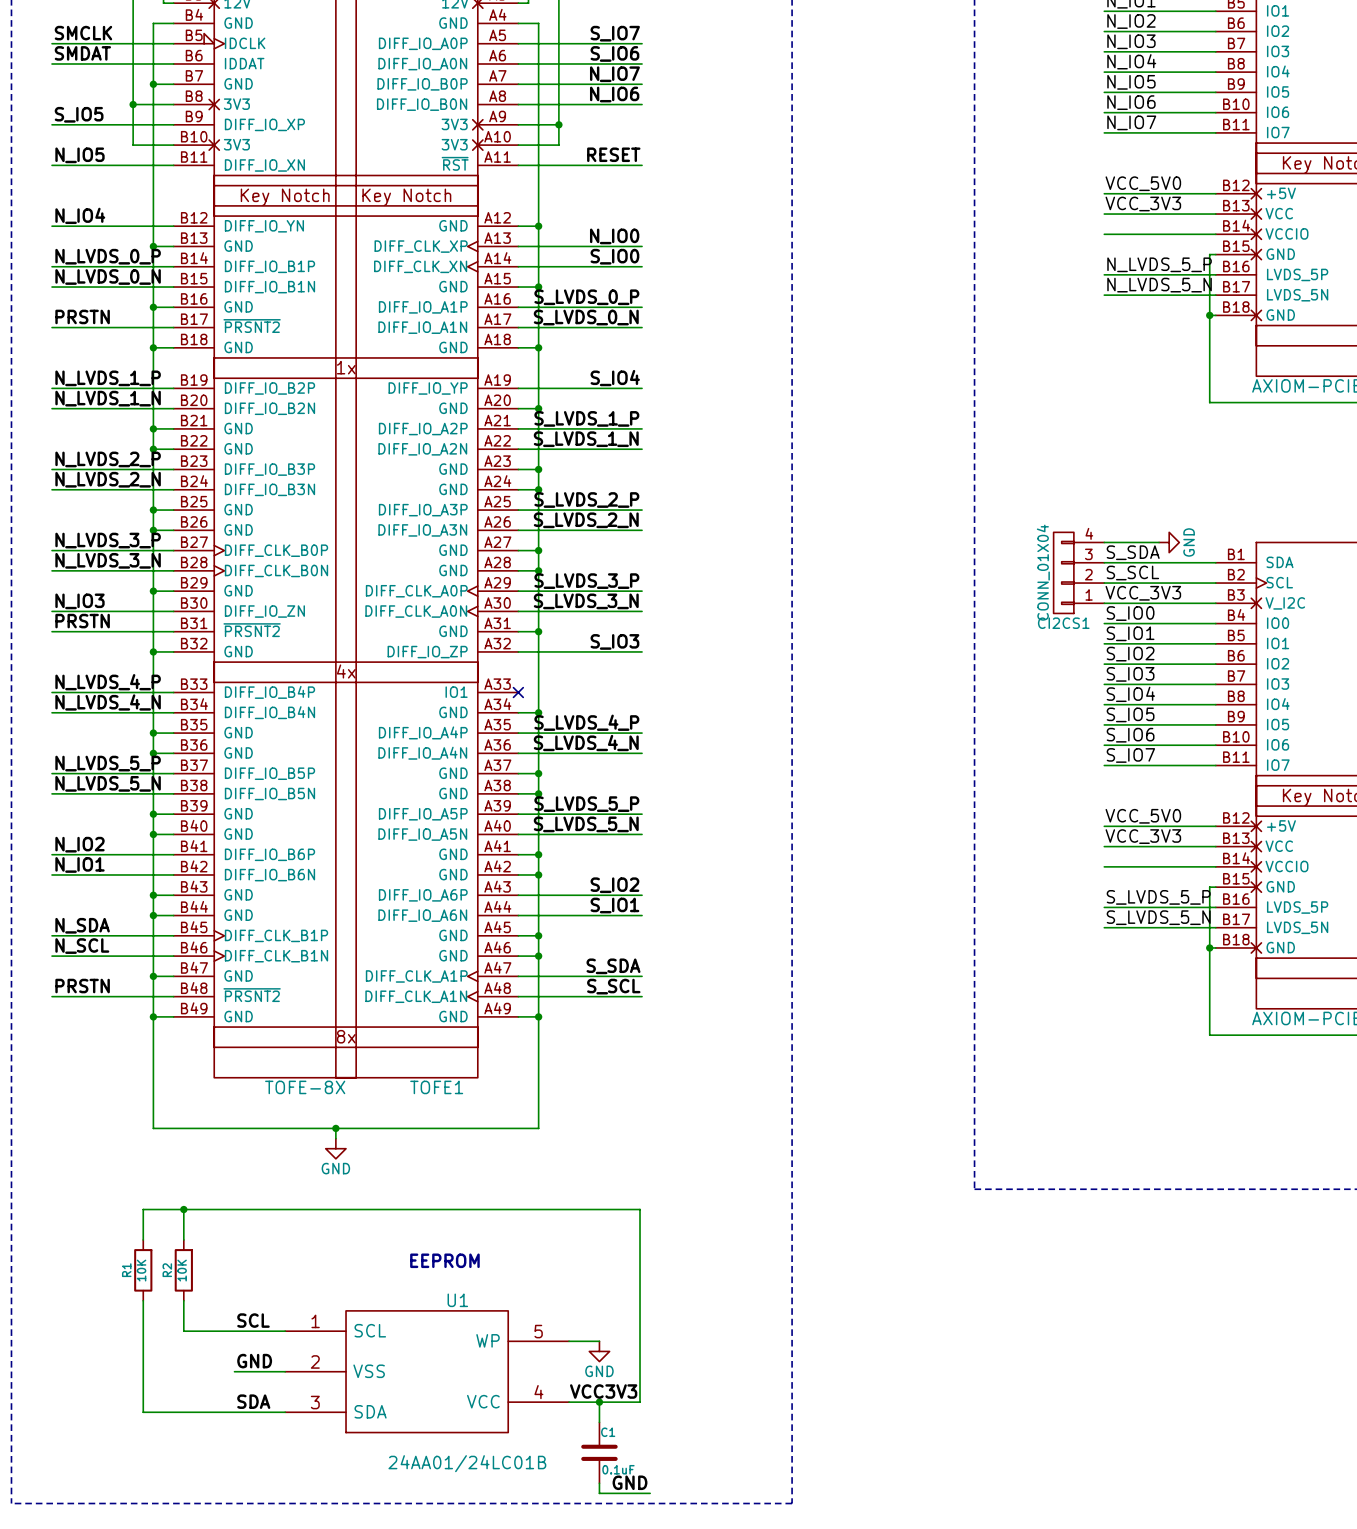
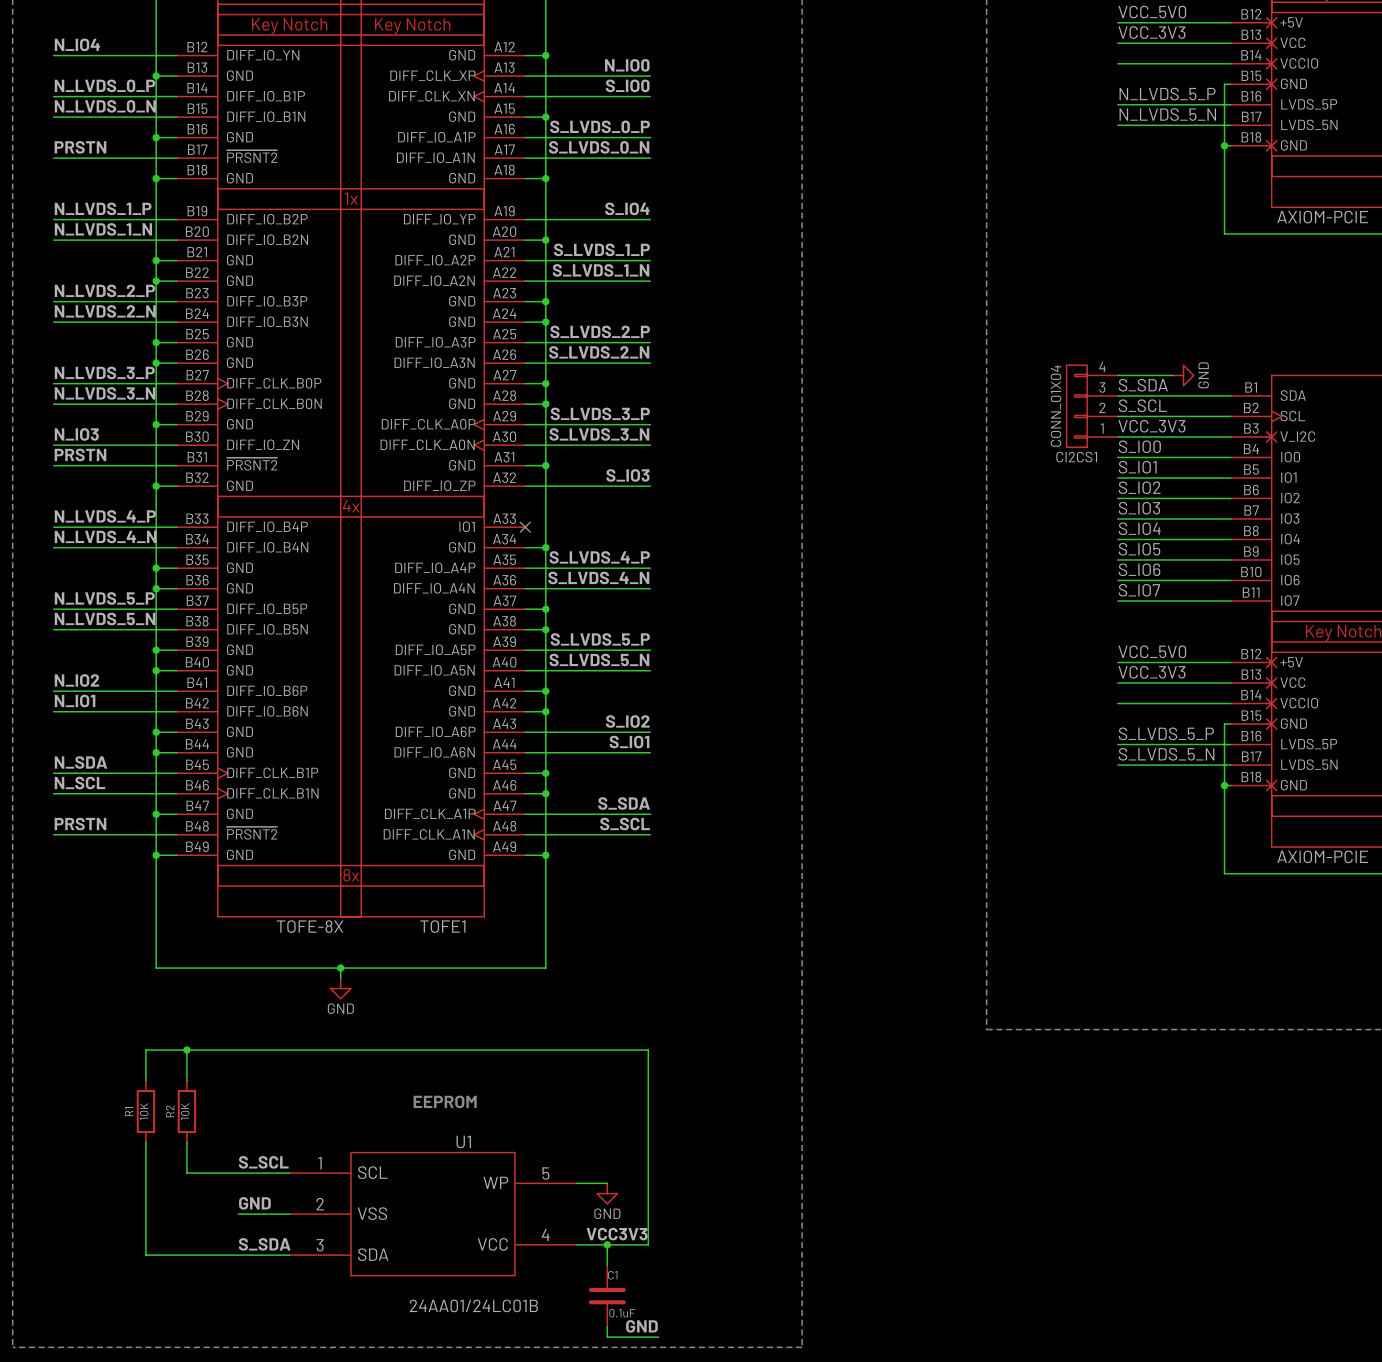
label: SCL (253, 1320) -> S_SCL (263, 1162)
label: SDA (253, 1401) -> S_SDA (264, 1244)

